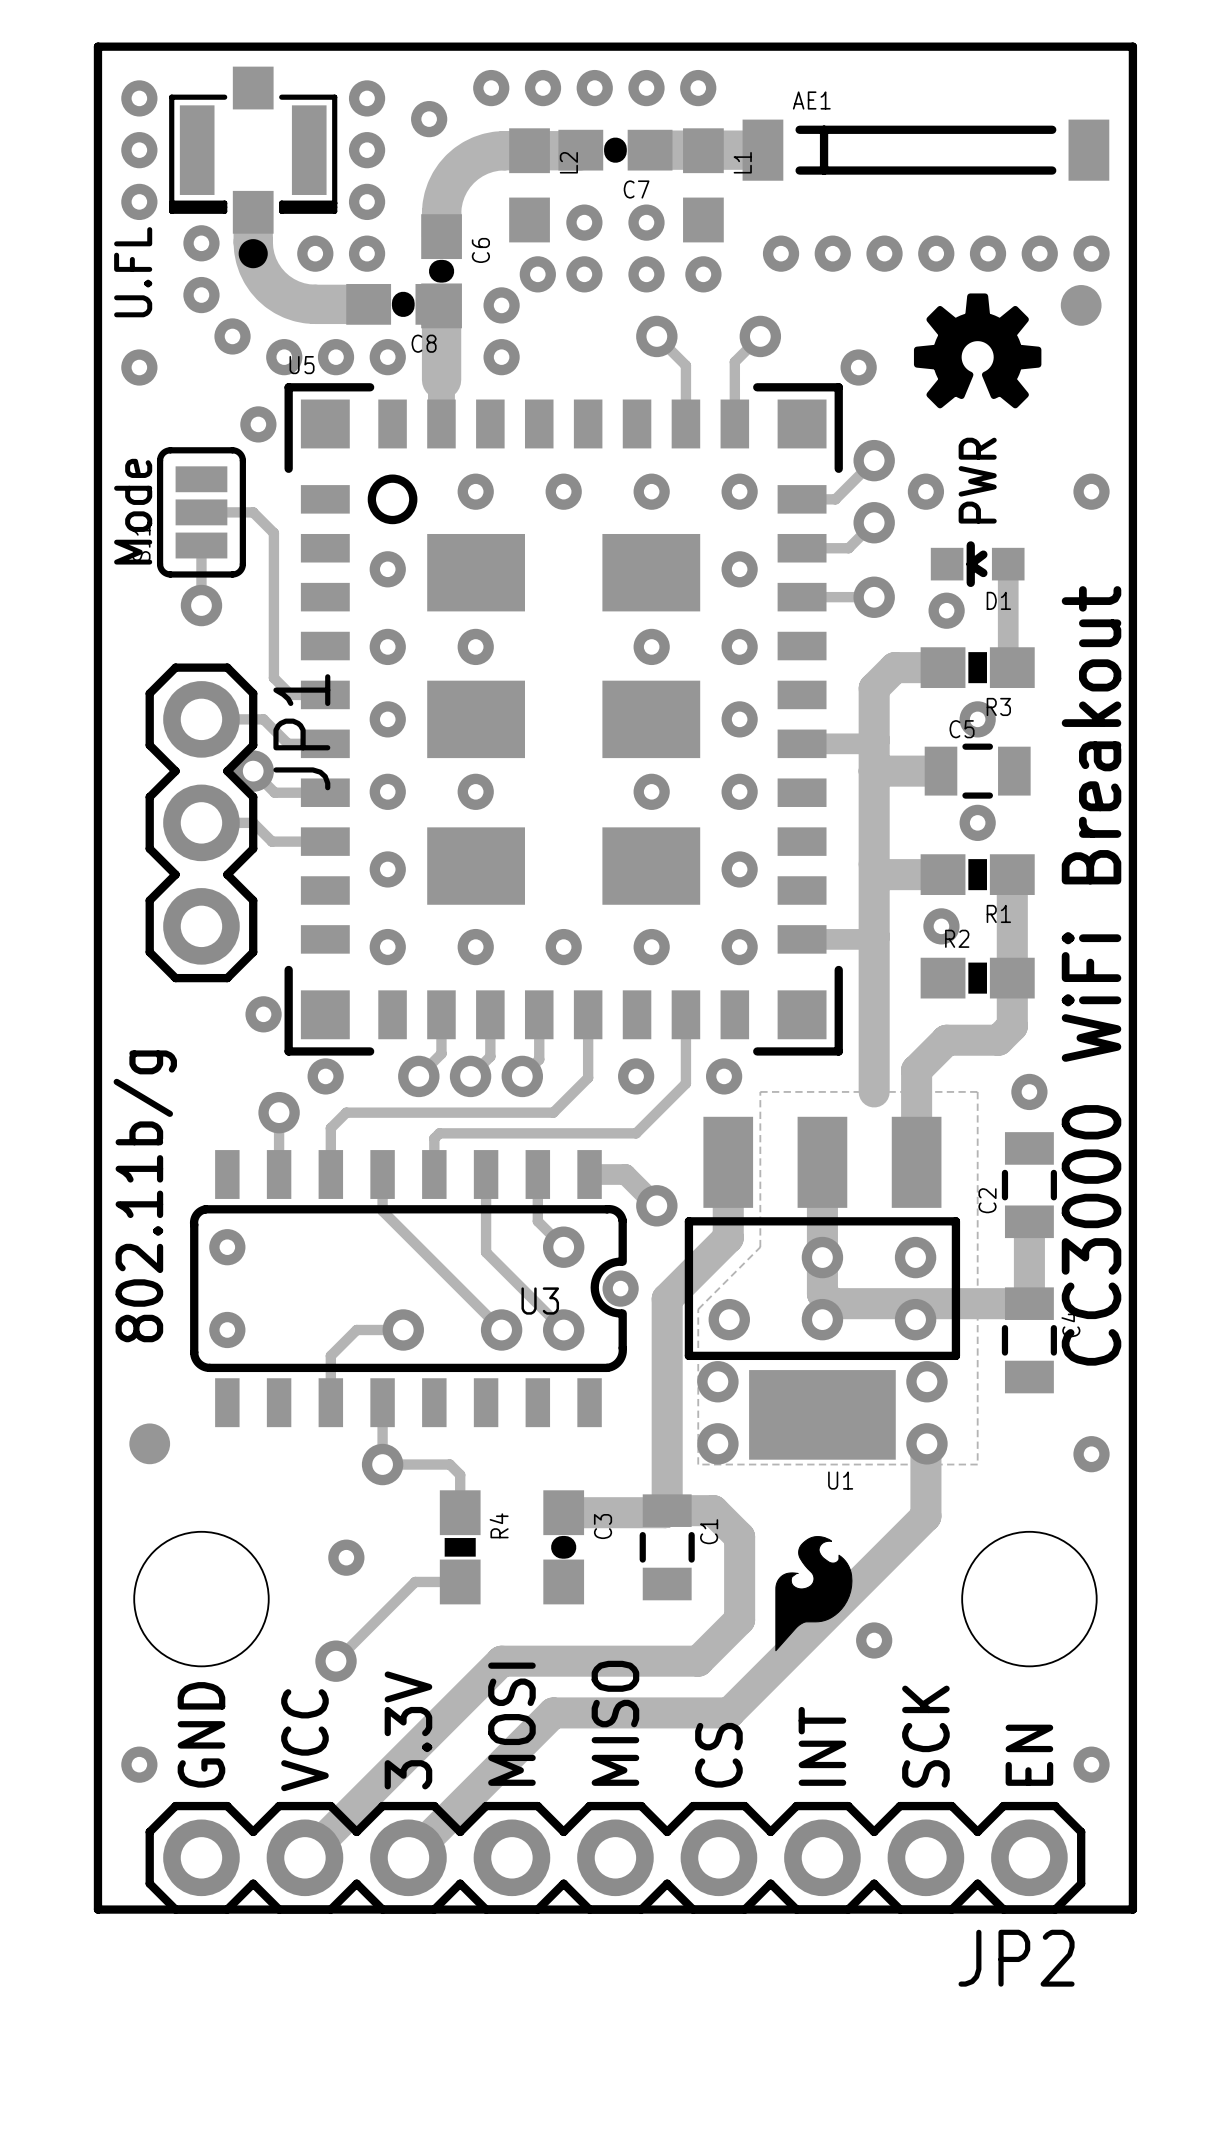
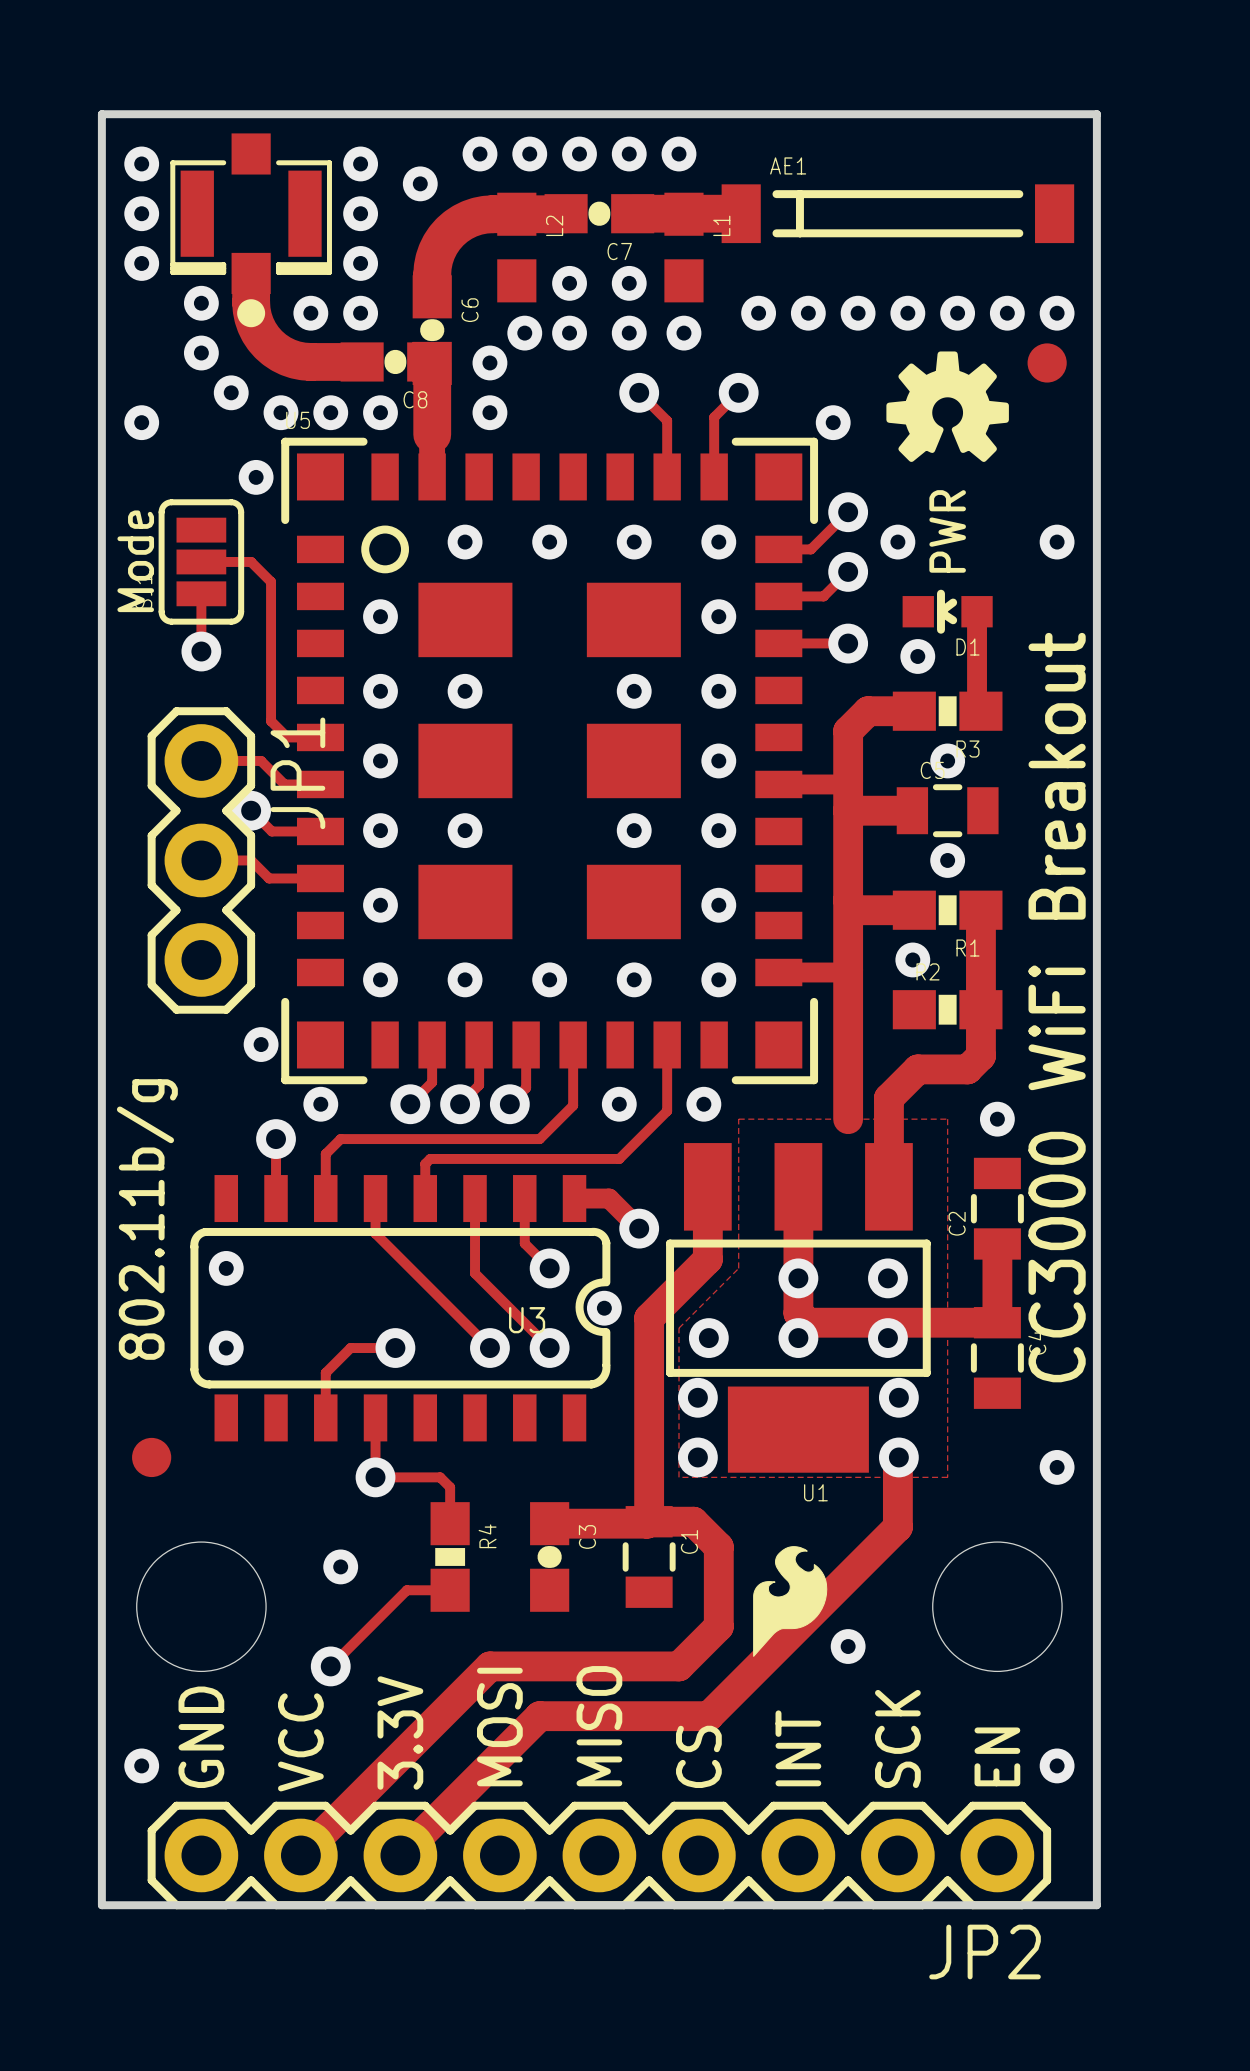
text: U.FL (133, 272) -> none

